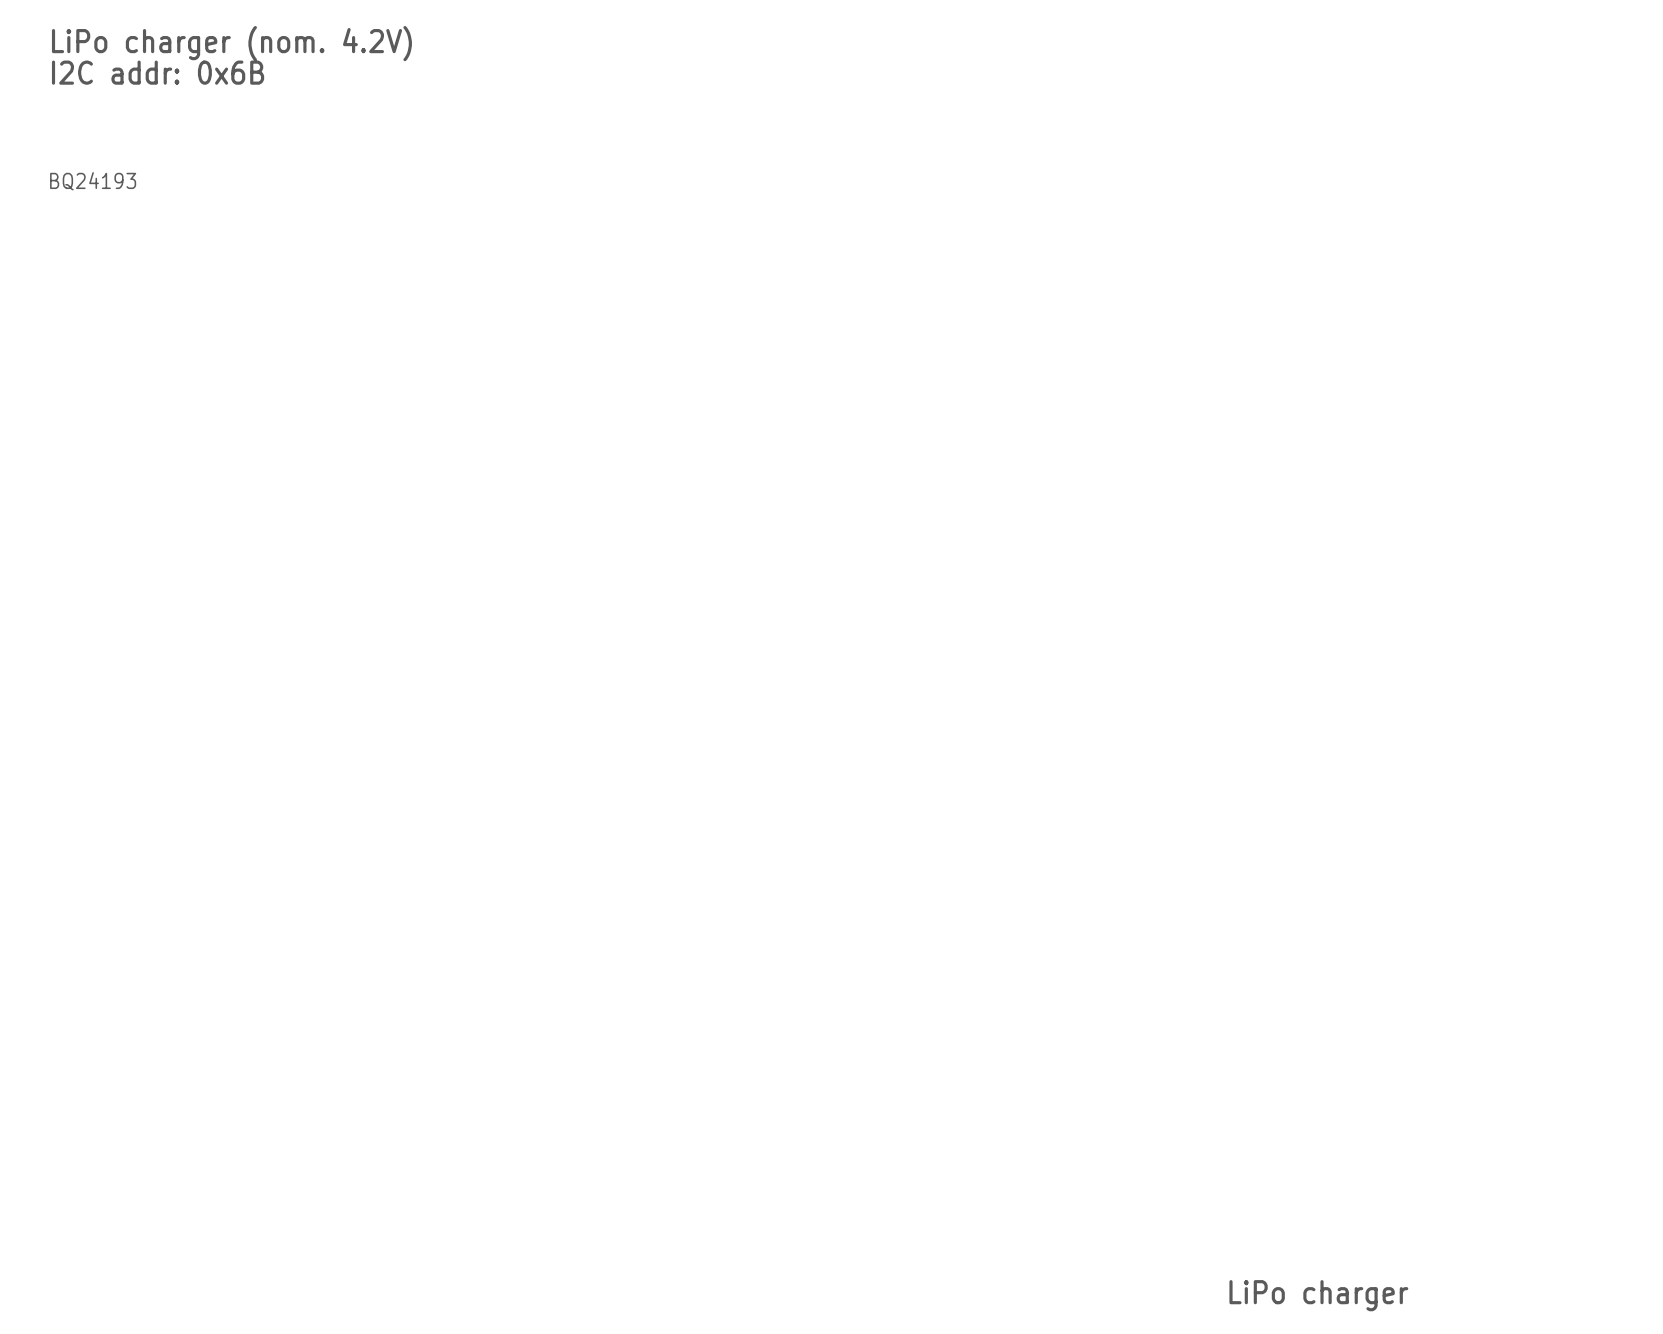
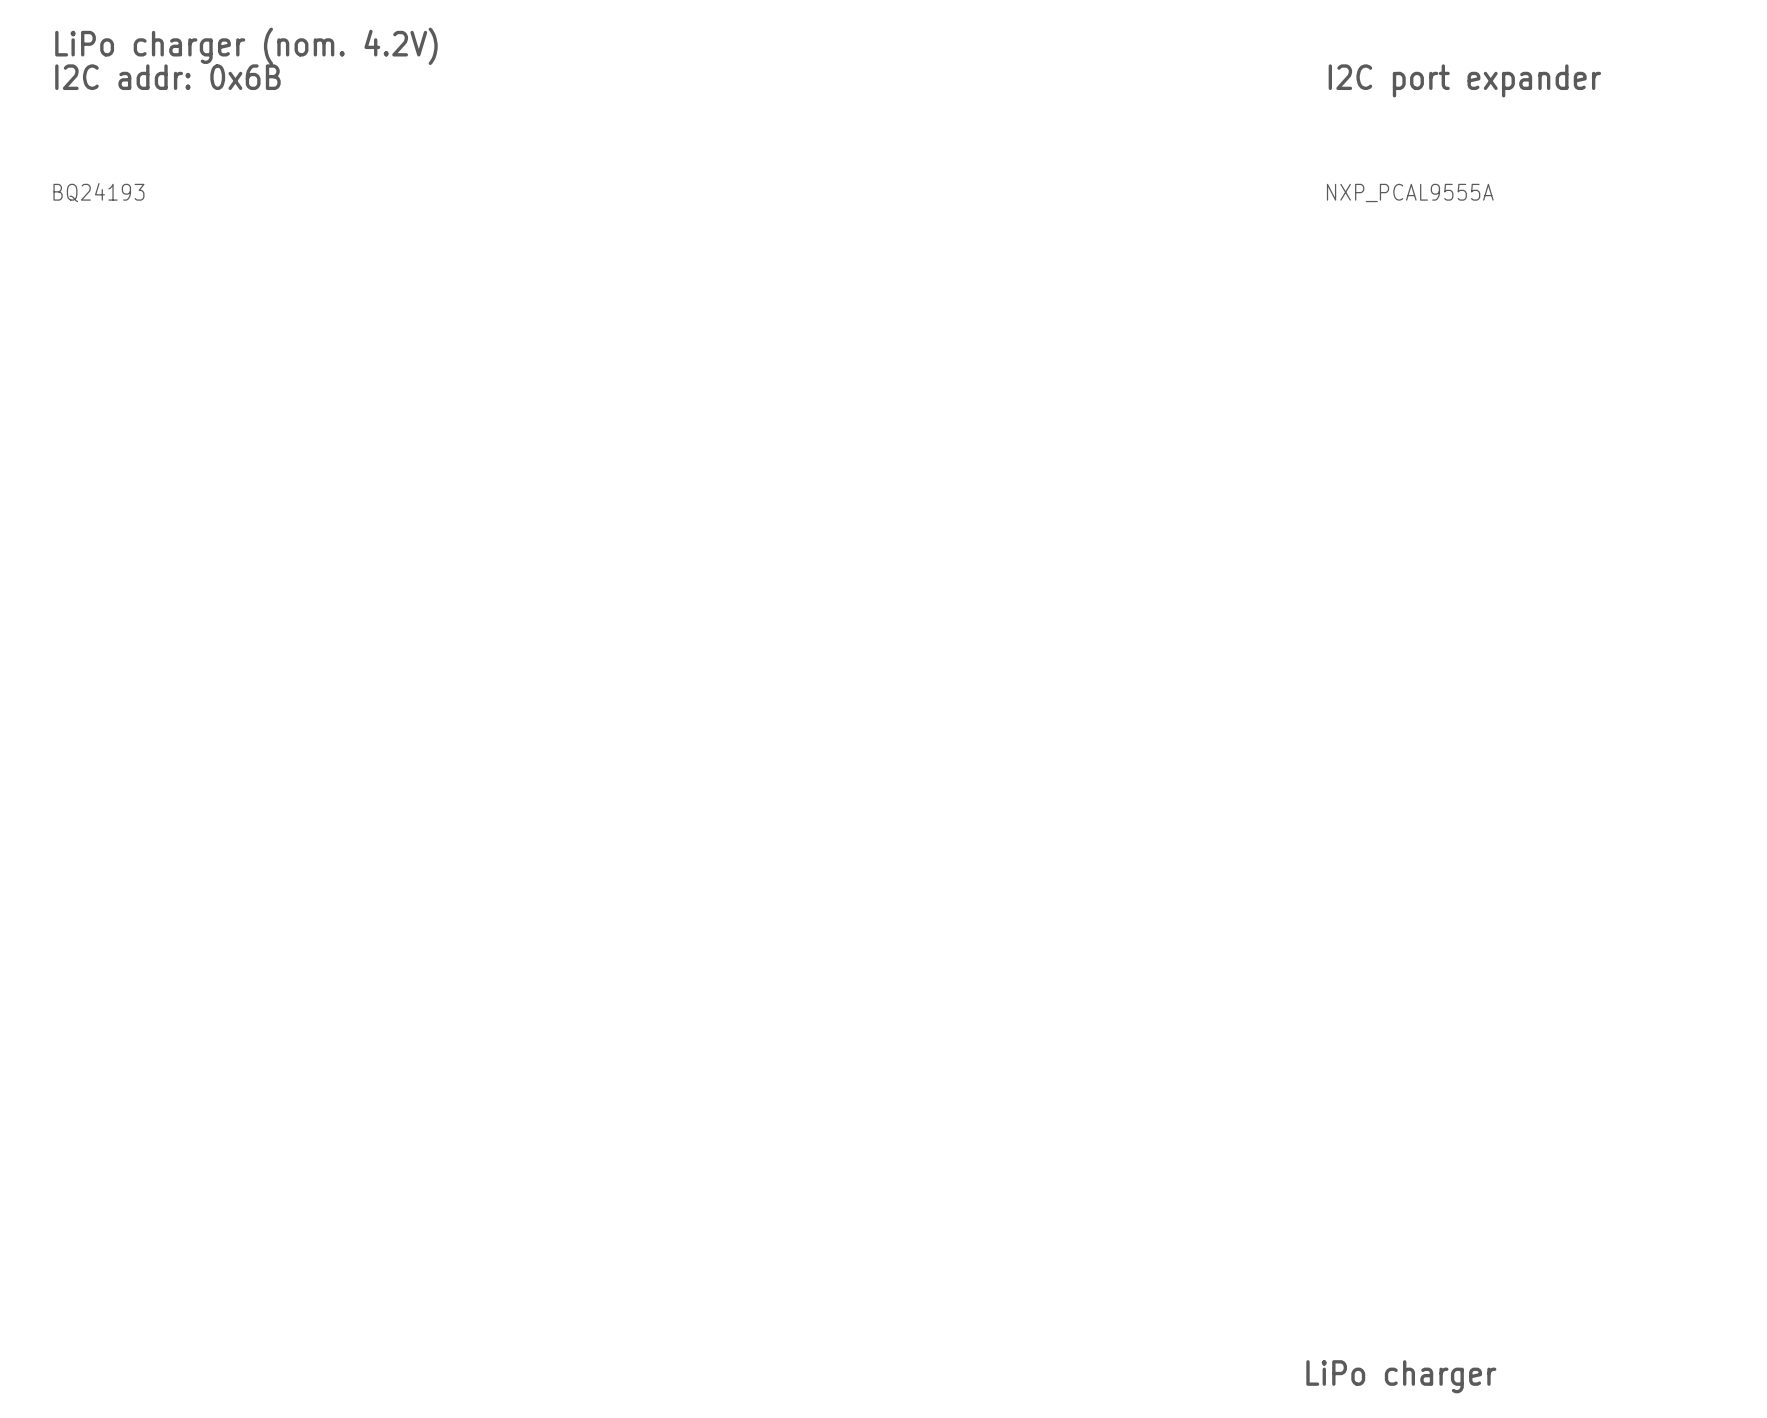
text: none -> I2C port expander (1464, 80)
text: none -> NXP_PCAL9555A (1410, 192)

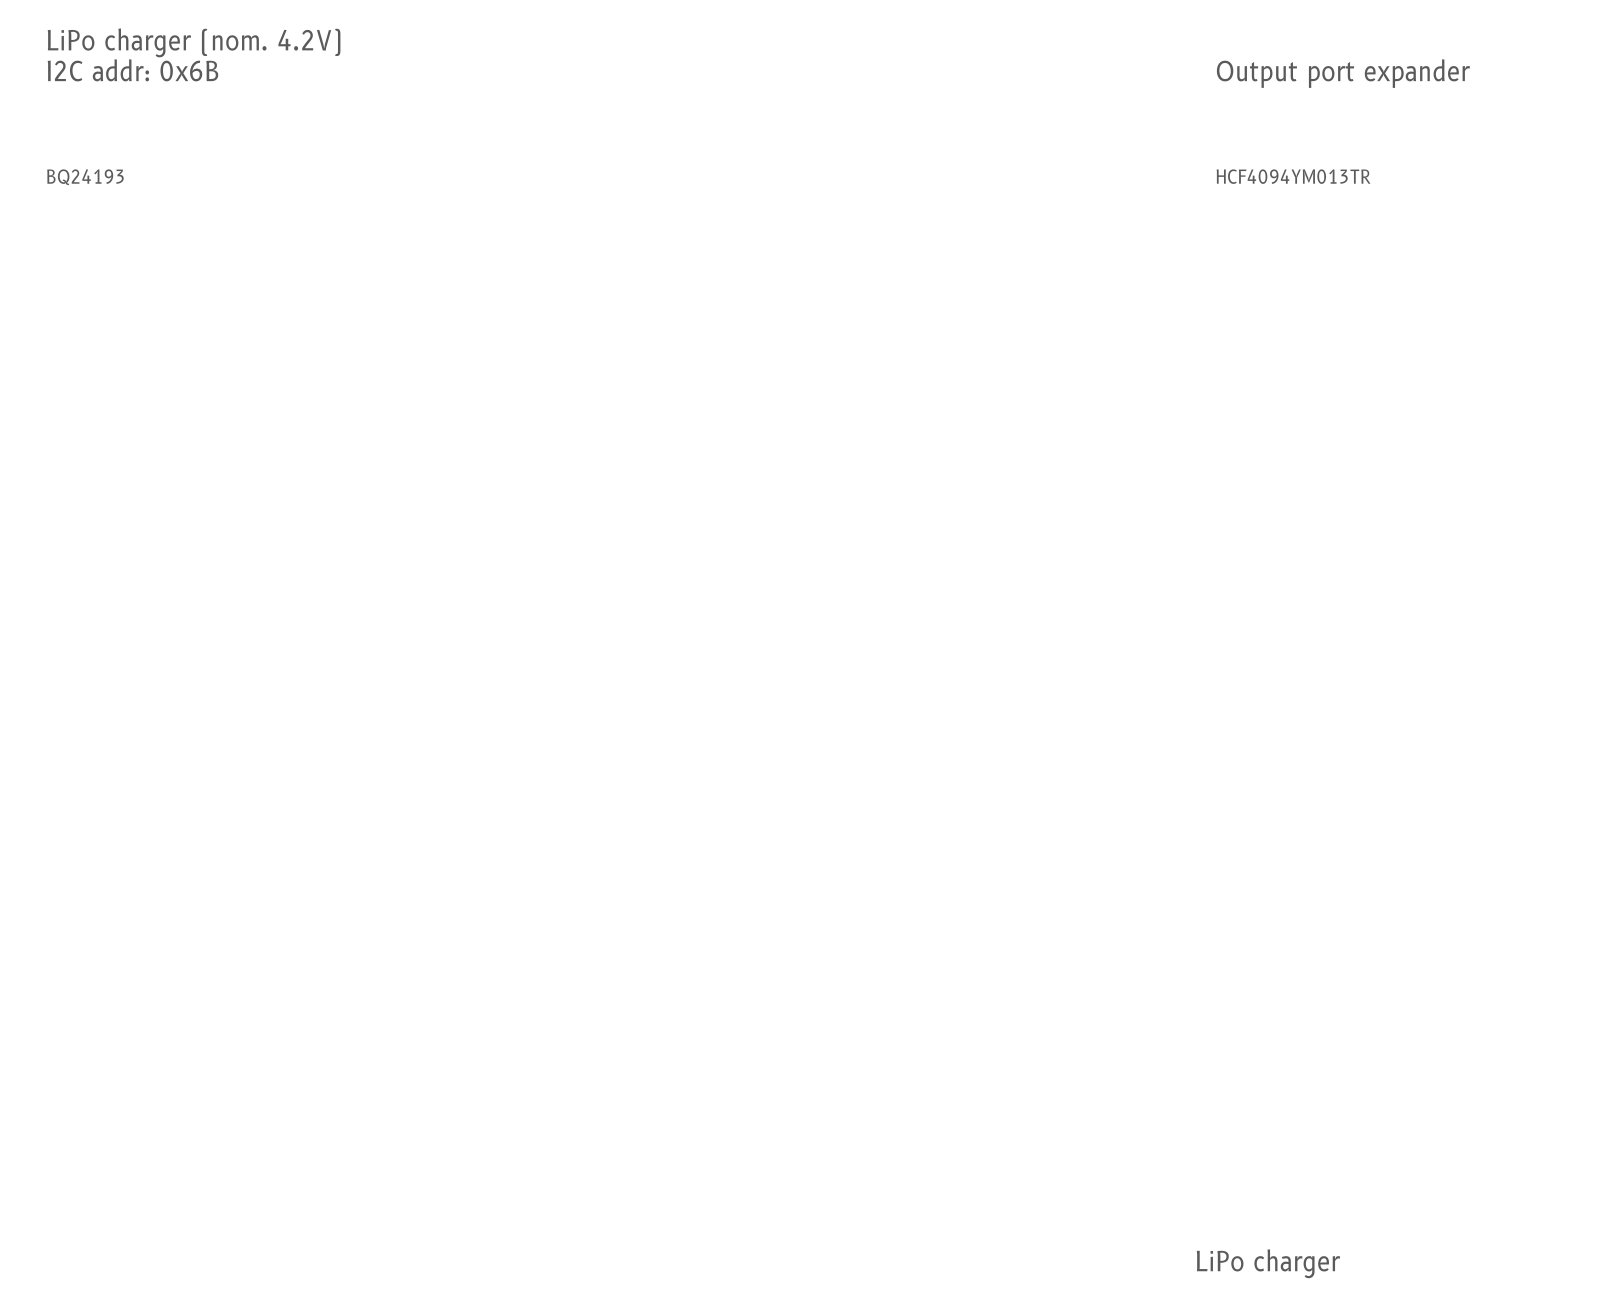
text: I2C port expander (1464, 80) -> Output port expander (1343, 73)
text: NXP_PCAL9555A (1410, 192) -> HCF4094YM013TR (1293, 176)

